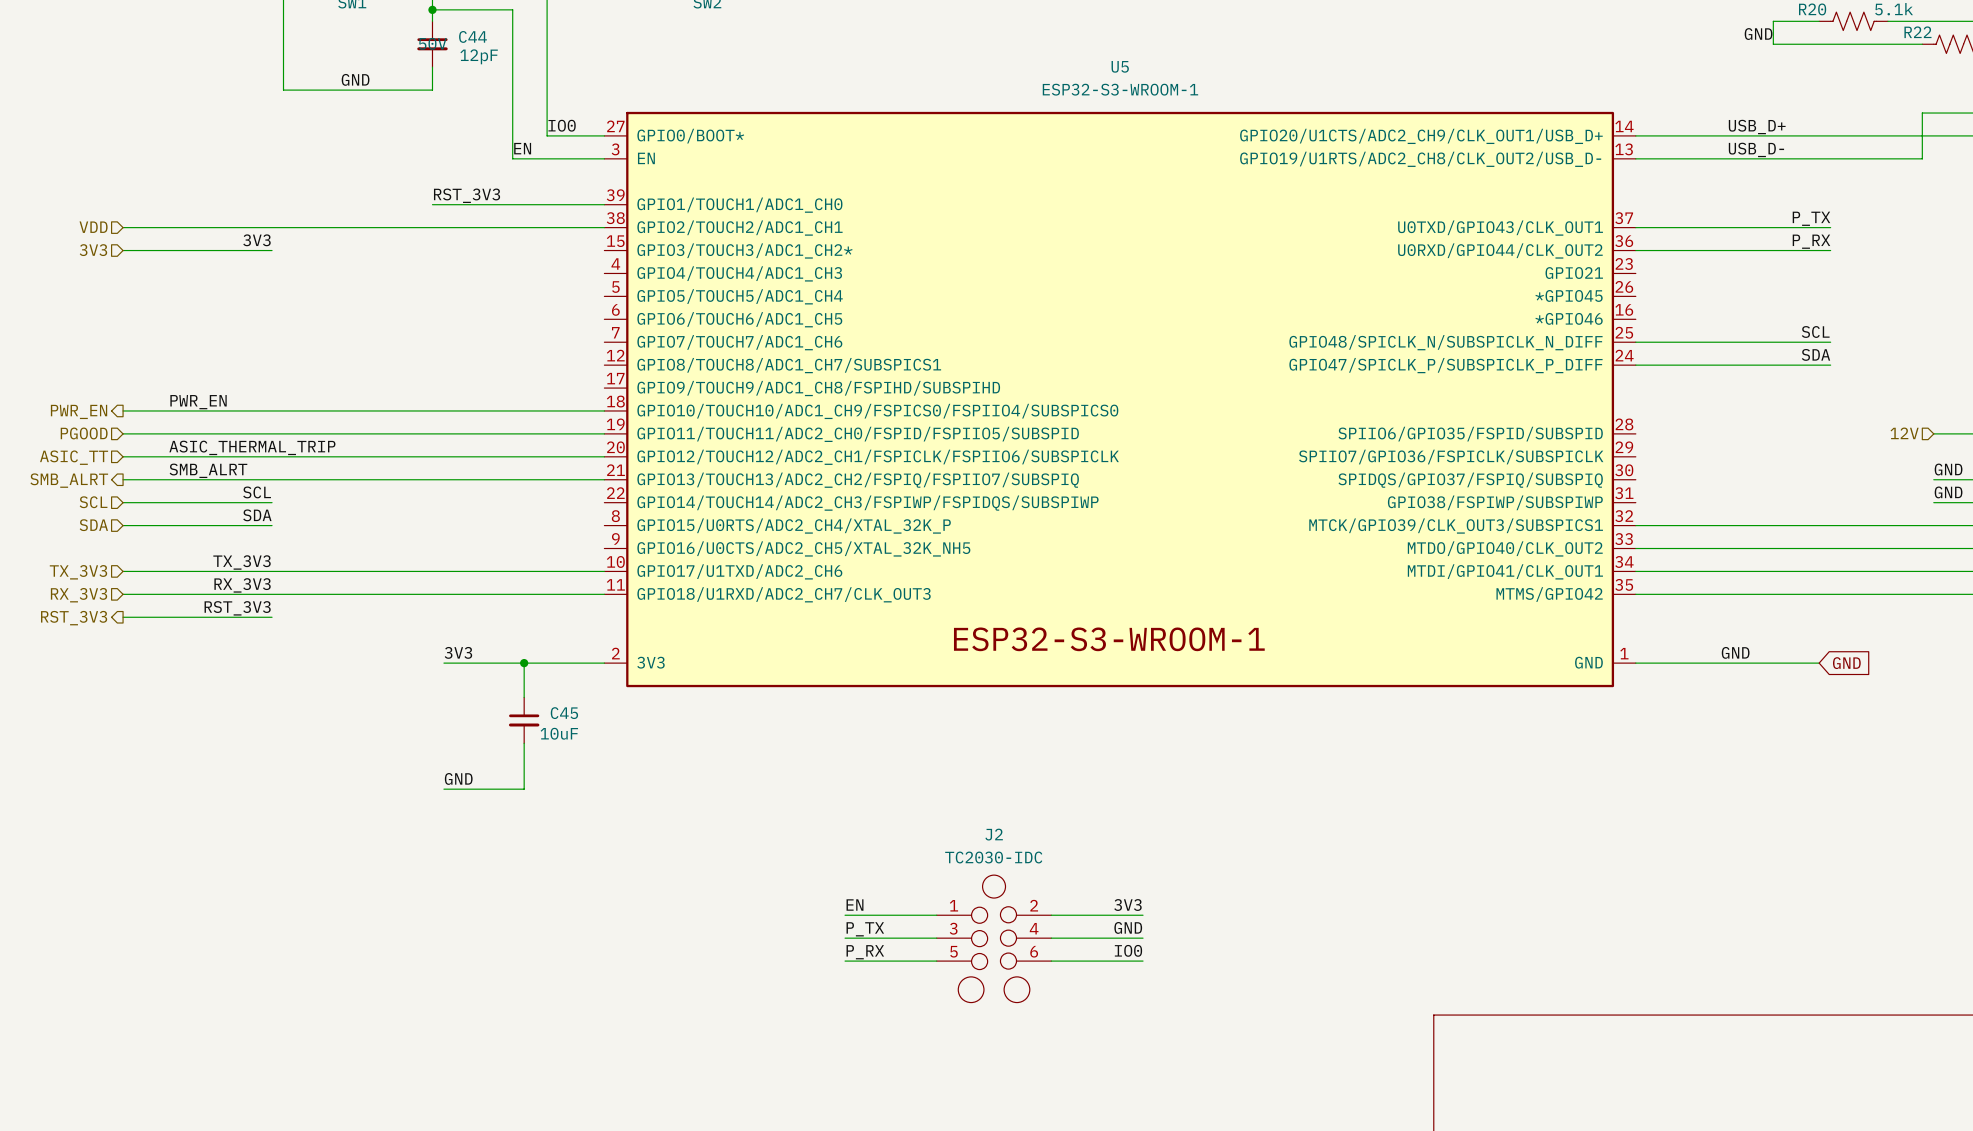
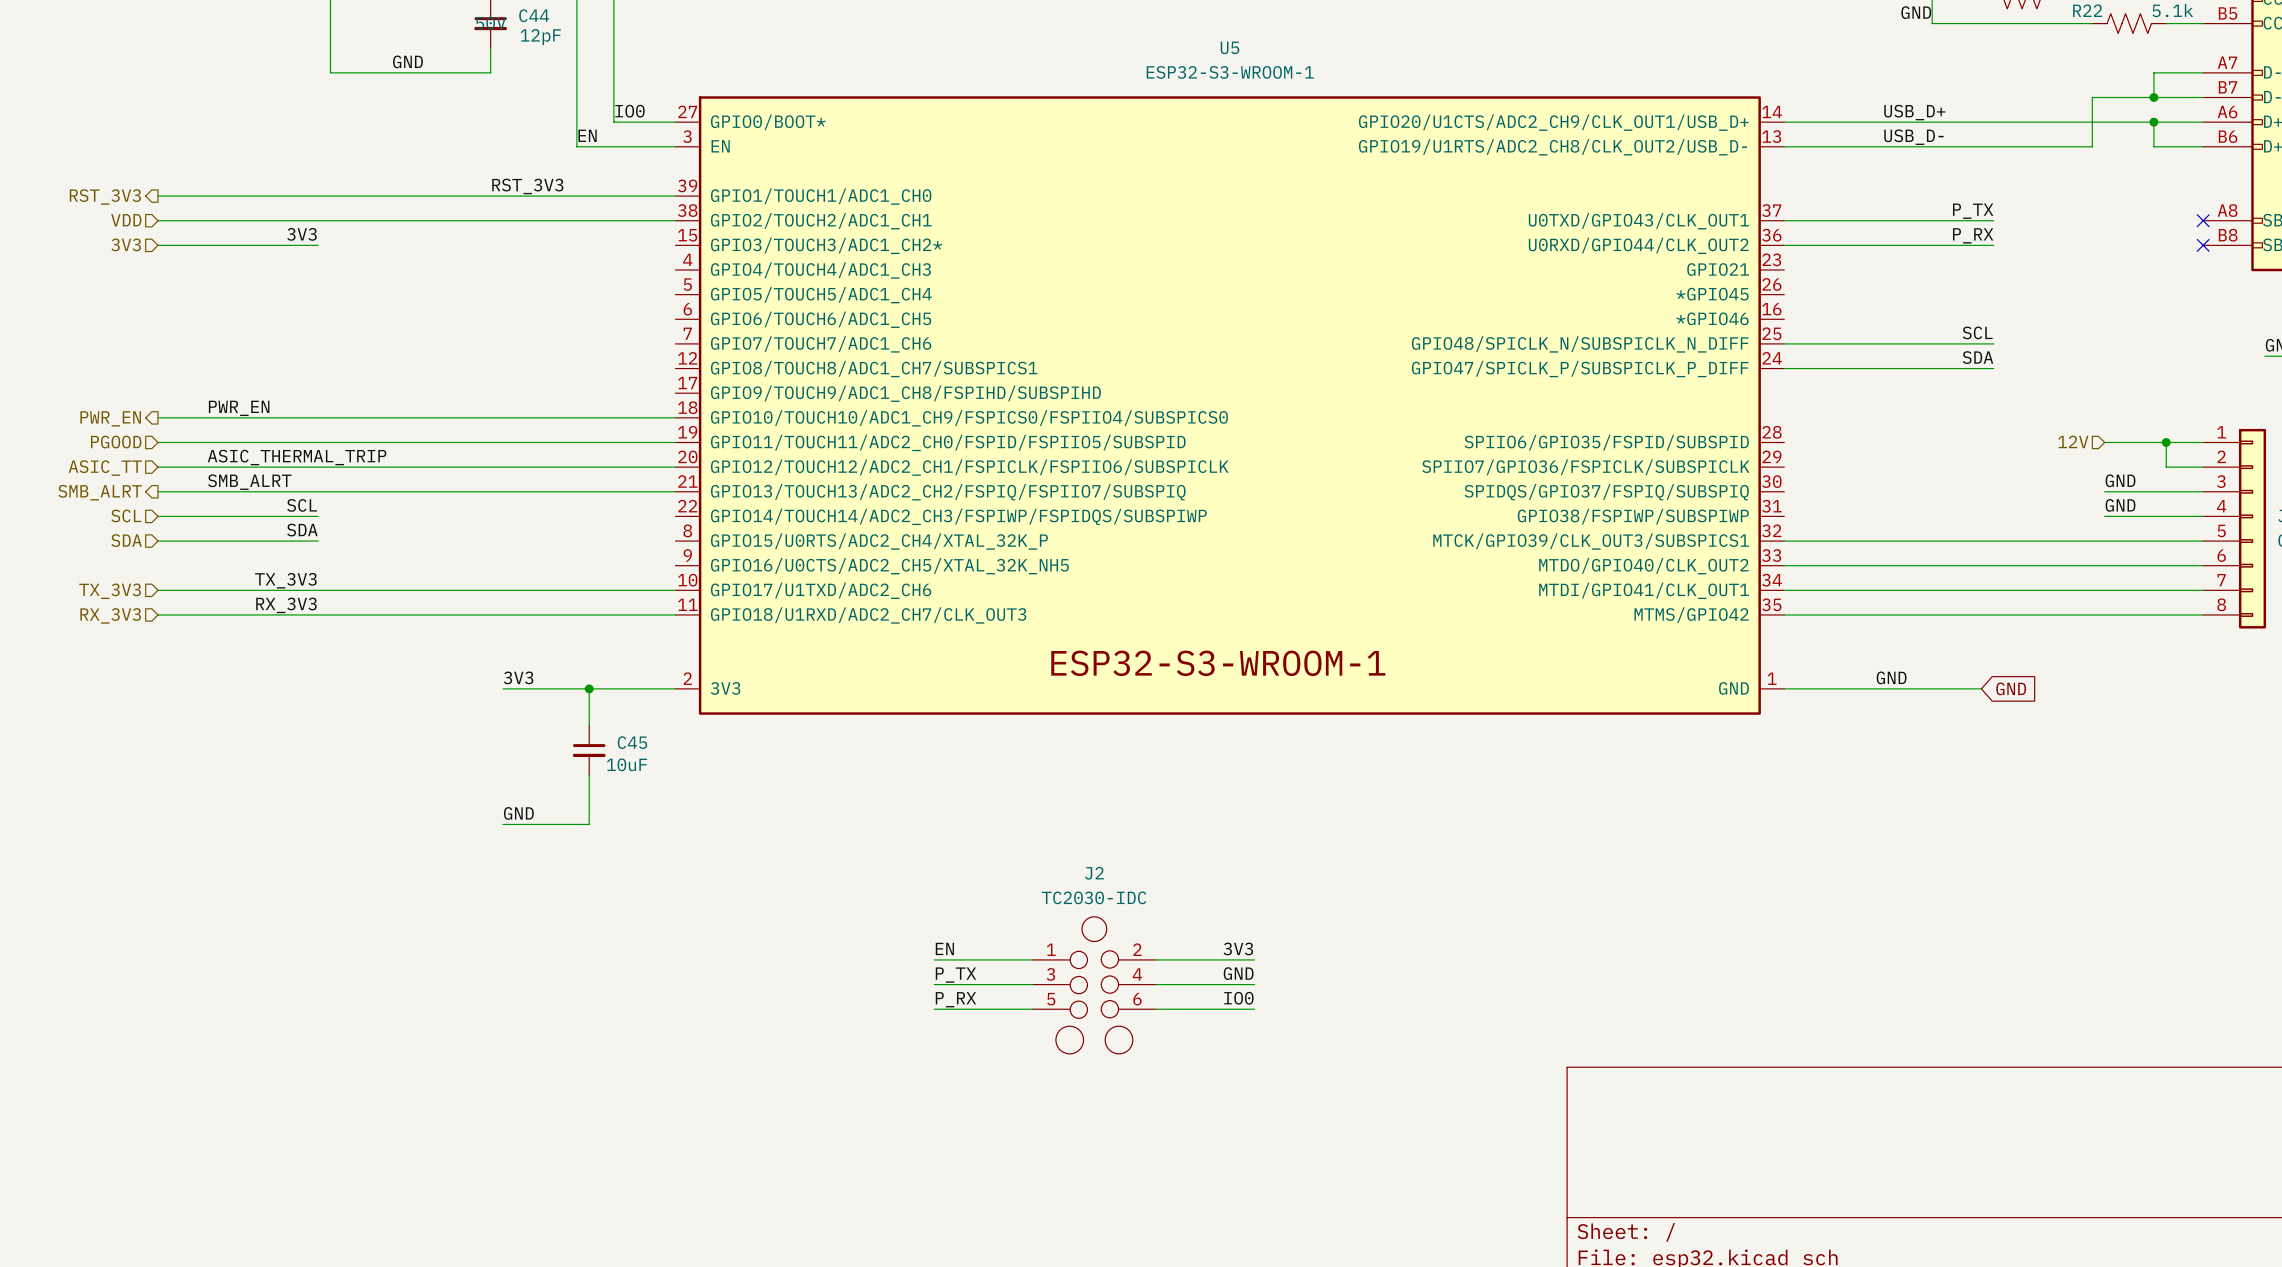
wire: none -> (158, 196) (490, 196)
hierarchical label: none -> RST_3V3 (105, 197)
label: RST_3V3 (237, 608) -> none
wire: (123, 617) (272, 617) -> none
hierarchical label: RST_3V3 (74, 618) -> none

